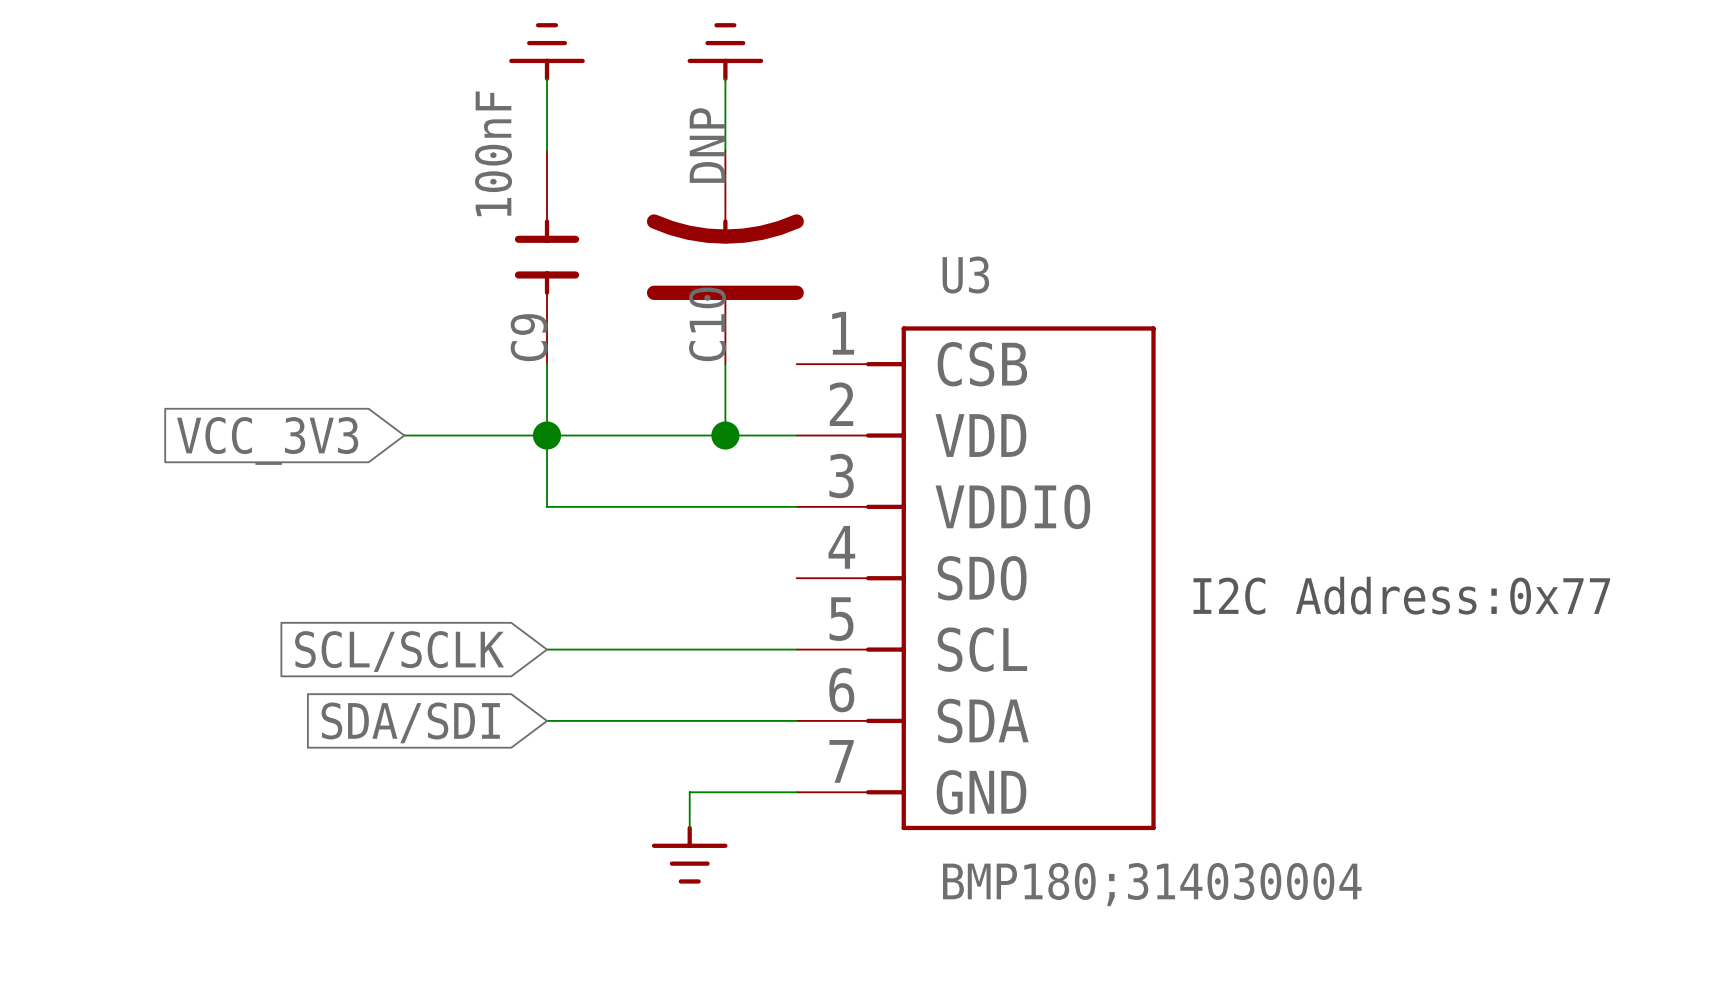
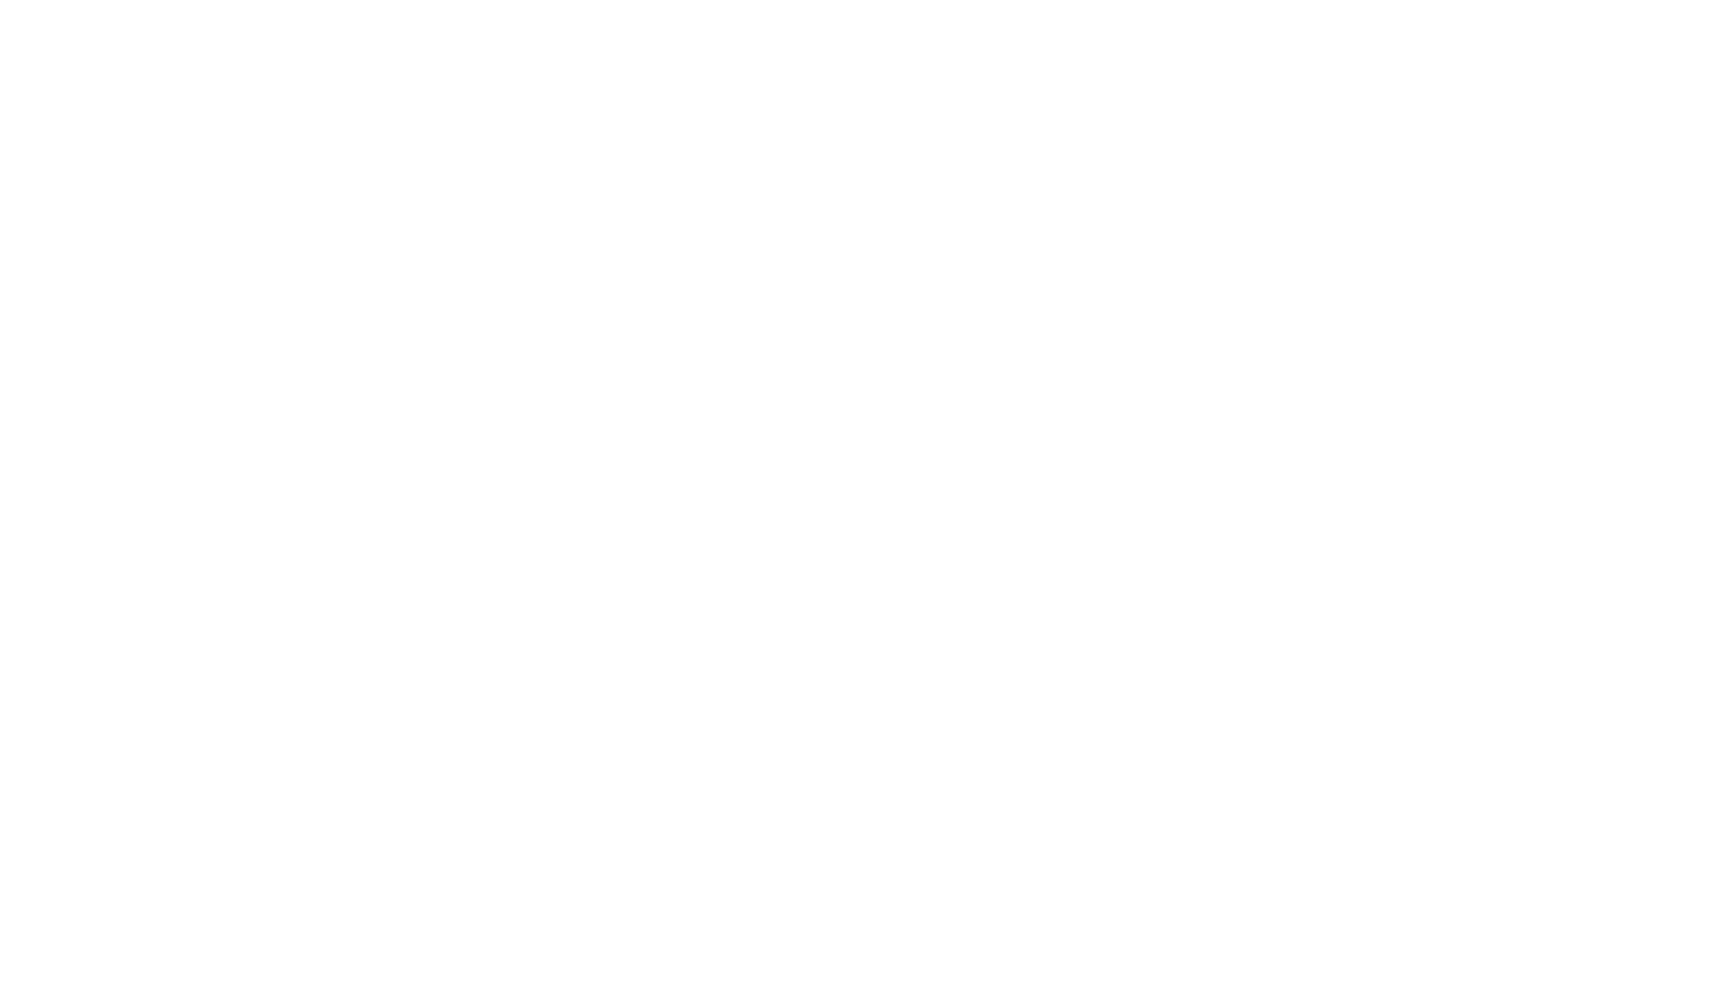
power symbol: (547, 52) -> none
power symbol: (725, 52) -> none
wire: (547, 78) (547, 150) -> none
wire: (725, 78) (725, 150) -> none
C9: 100nF (547, 257) -> none
C10: DNP (725, 257) -> none
wire: (547, 364) (547, 506) (796, 506) -> none
wire: (725, 364) (725, 435) -> none
wire: (404, 435) (796, 435) -> none
junction: (547, 435) -> none
junction: (725, 435) -> none
global label: VCC_3V3 (267, 440) -> none
U3: BMP180;314030004 (976, 578) -> none
text: I2C Address:0x77 (1401, 595) -> none
wire: (547, 649) (796, 649) -> none
global label: SCL/SCLK (399, 651) -> none
wire: (547, 720) (796, 720) -> none
global label: SDA/SDI (410, 722) -> none
wire: (796, 792) (689, 792) (689, 827) -> none
power symbol: (689, 854) -> none

